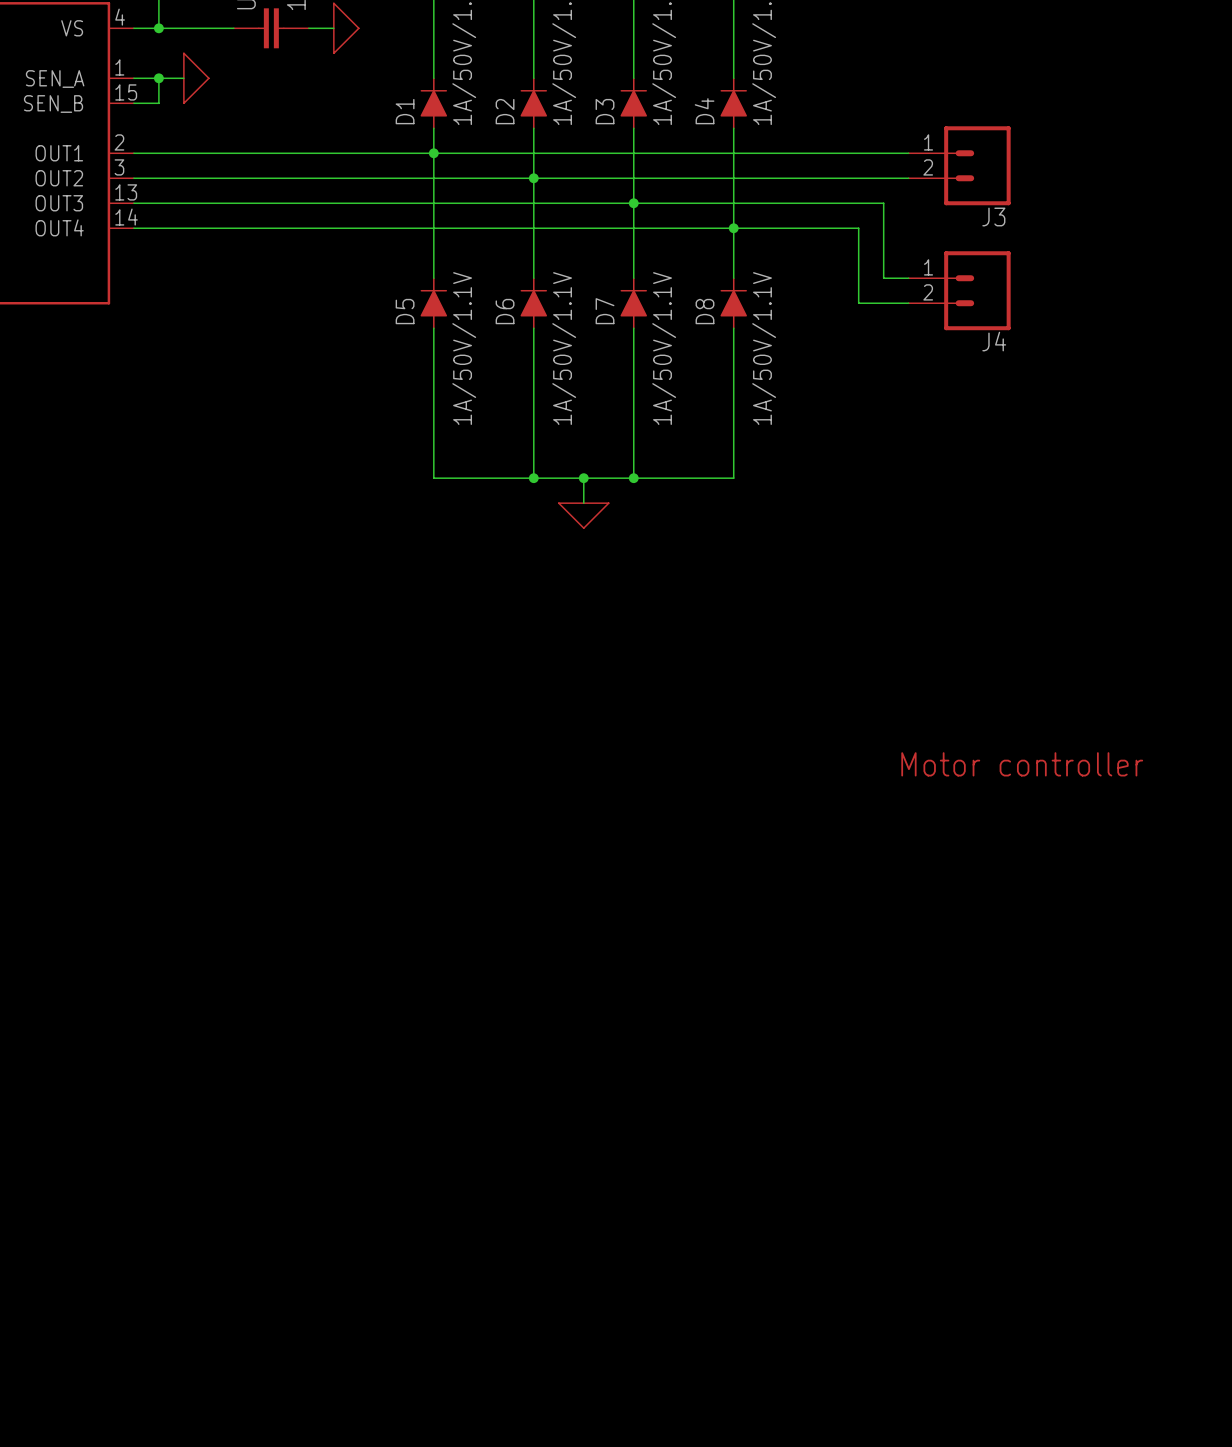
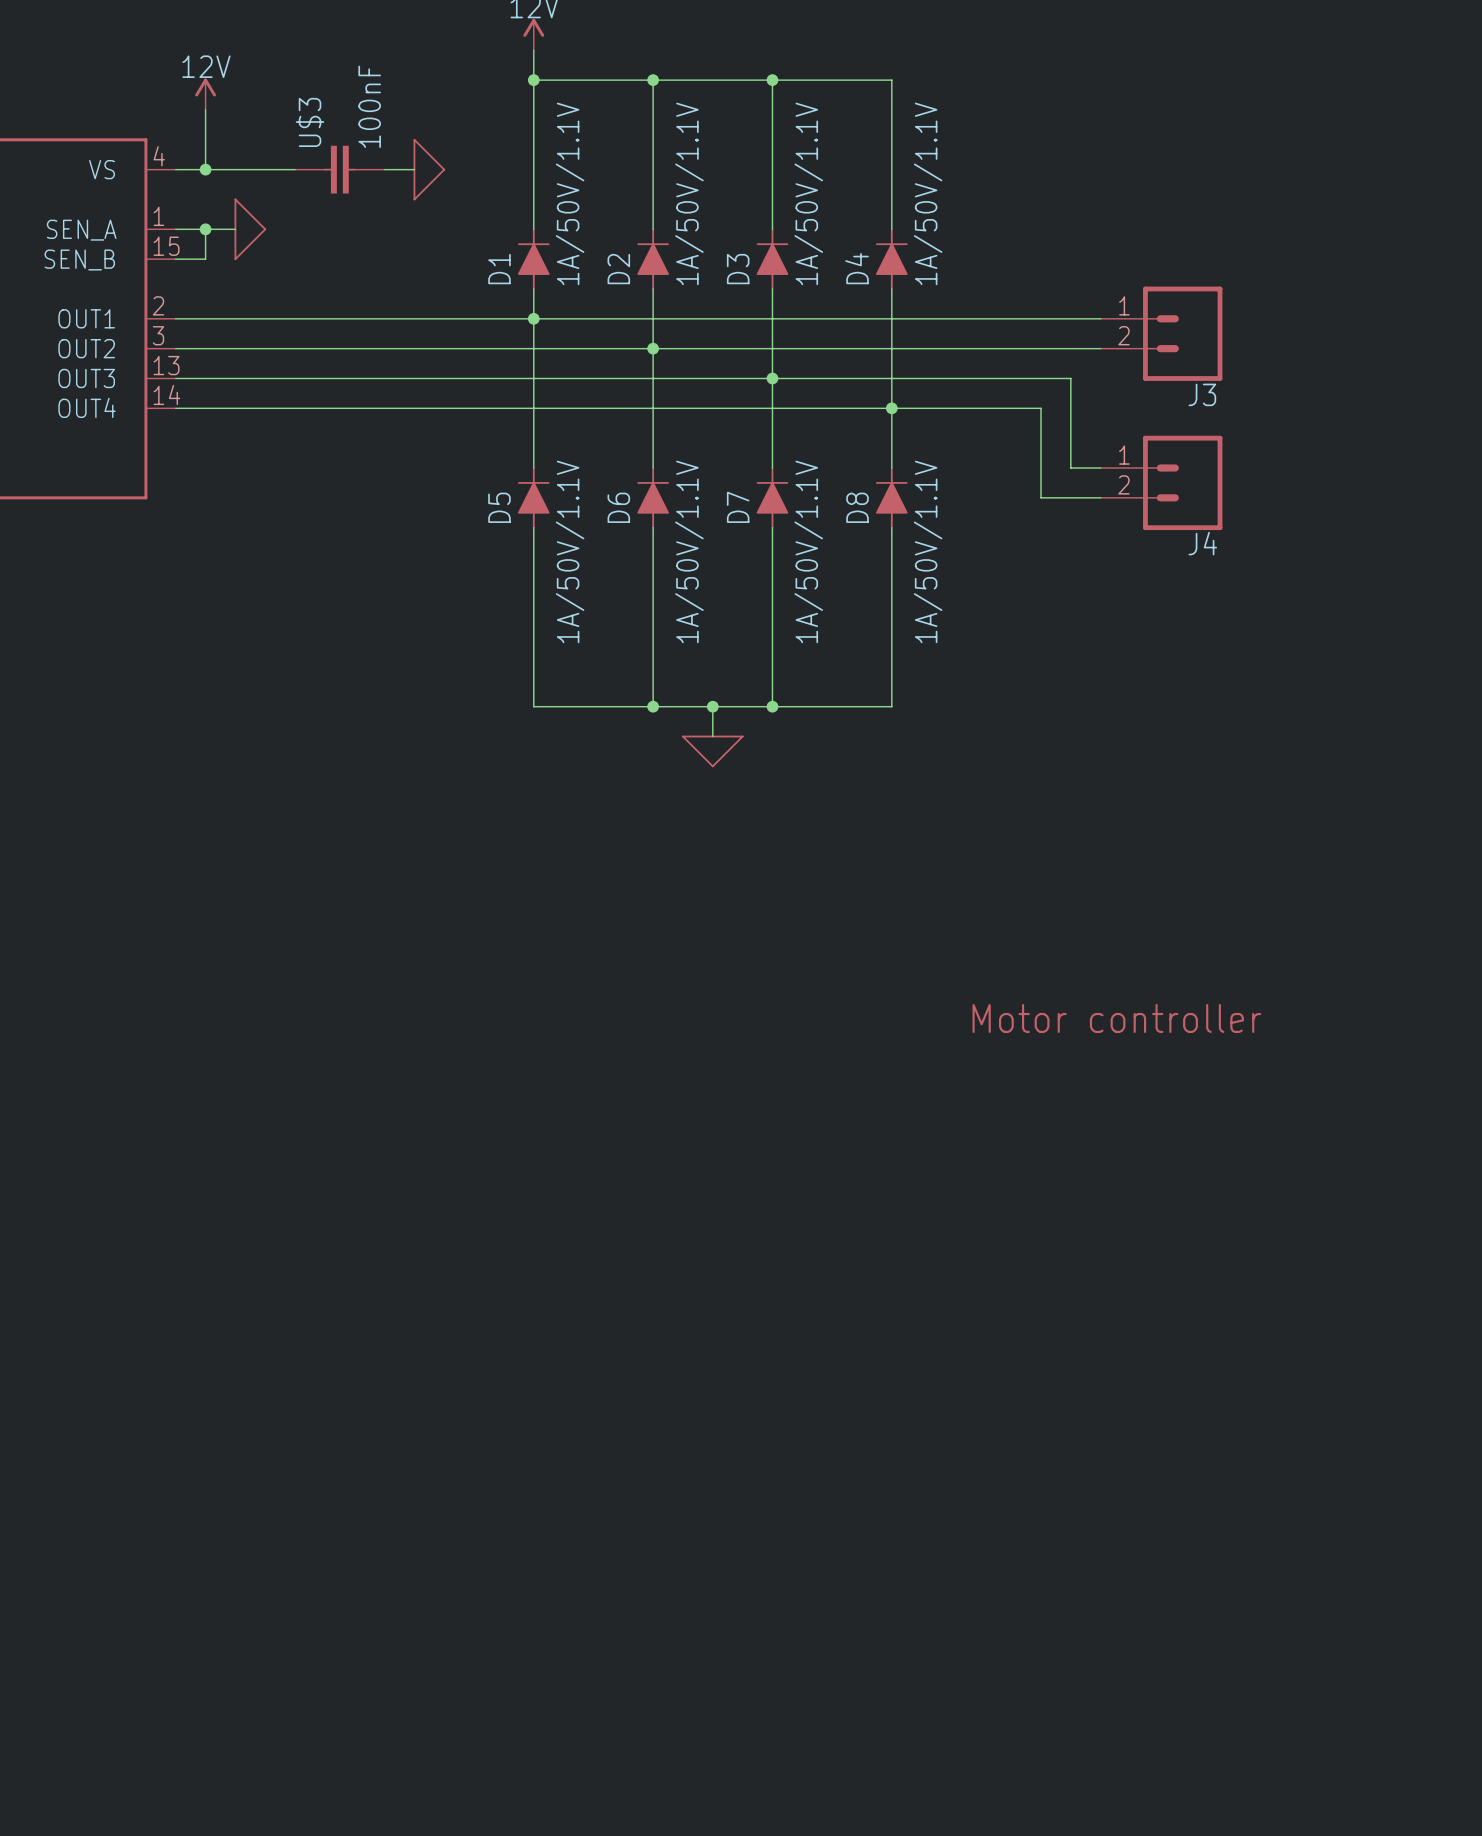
text position: Motor controller (1022, 764) -> Motor controller (1116, 1018)

